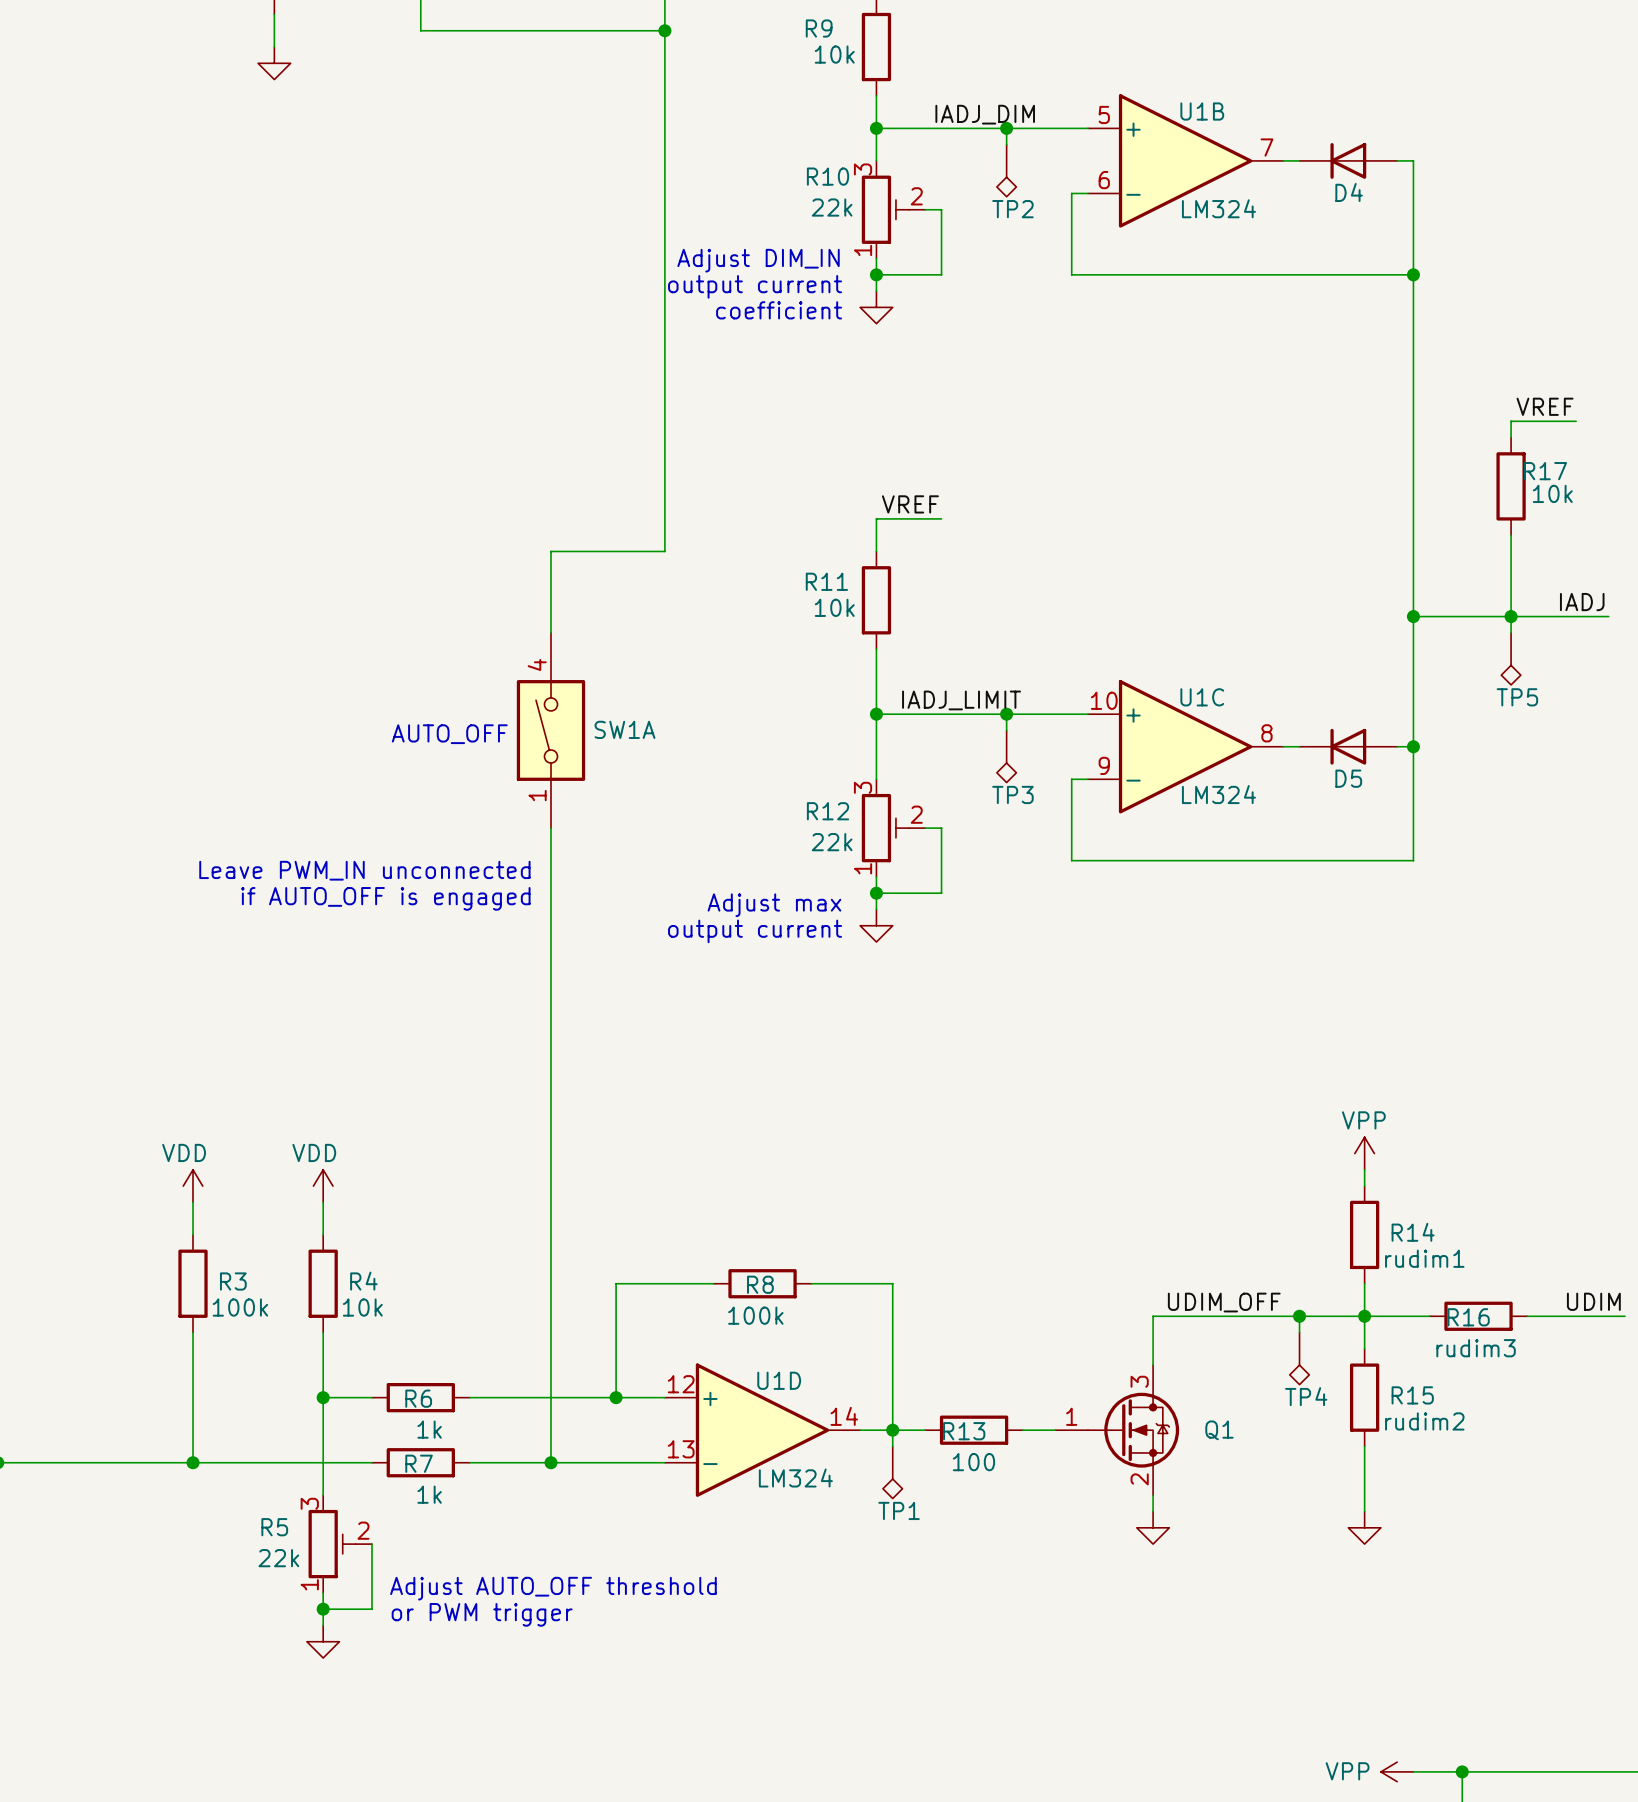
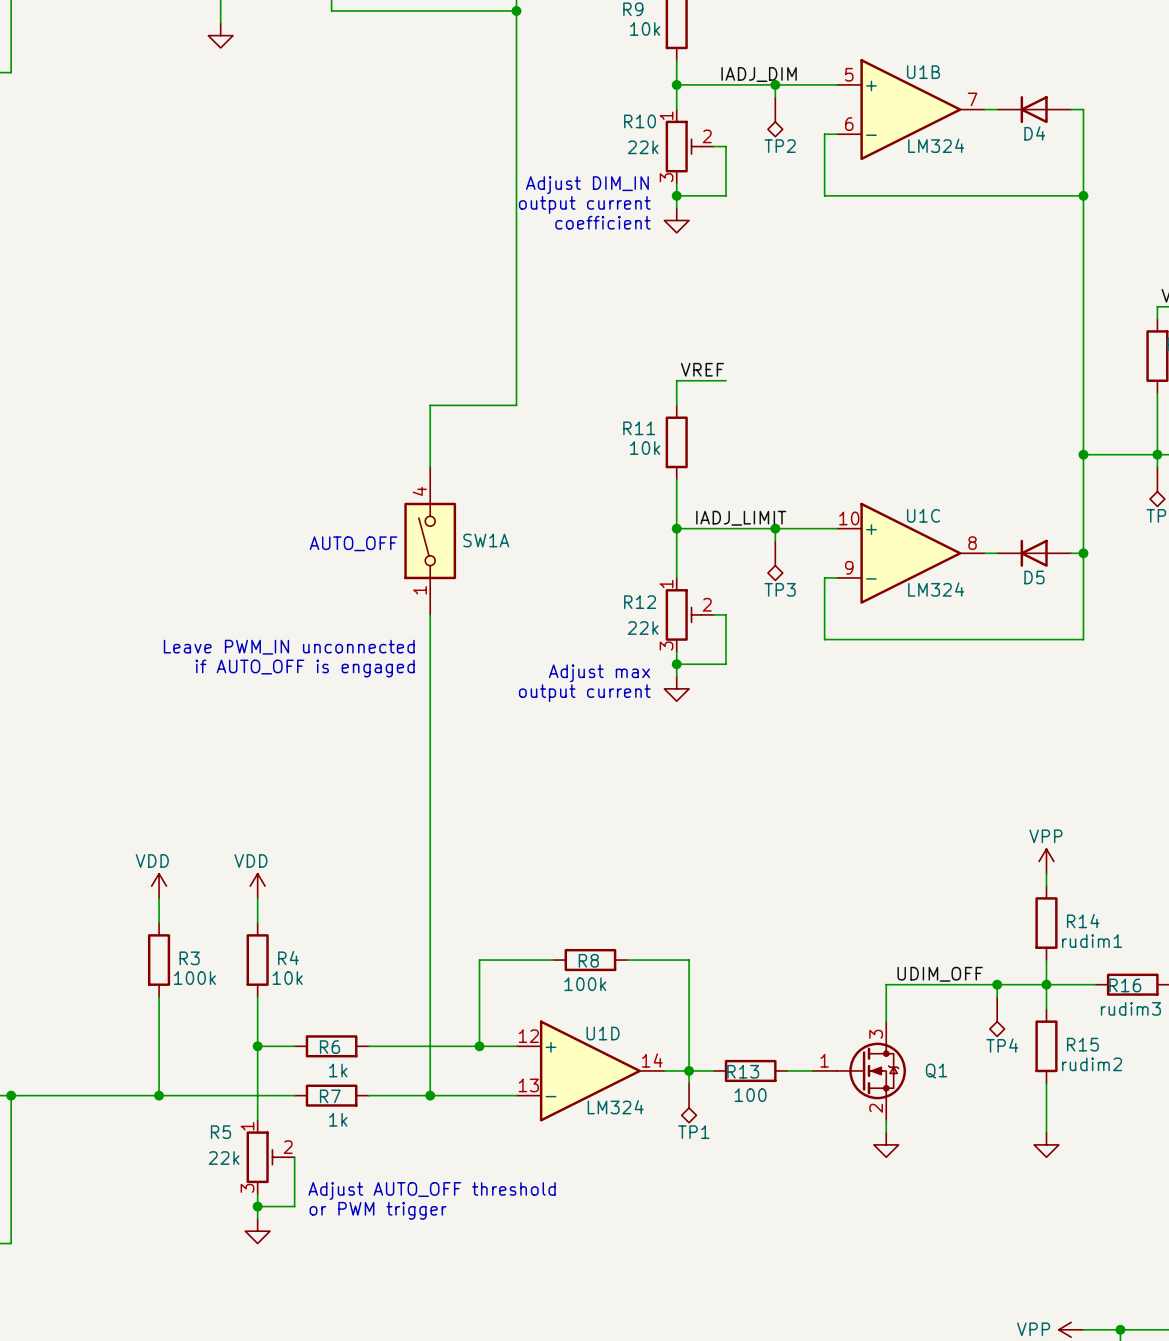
R10 flip: as is (885, 209) -> up-down (683, 146)
R12 flip: as is (885, 828) -> up-down (683, 614)
R5 flip: as is (332, 1544) -> up-down (264, 1157)

